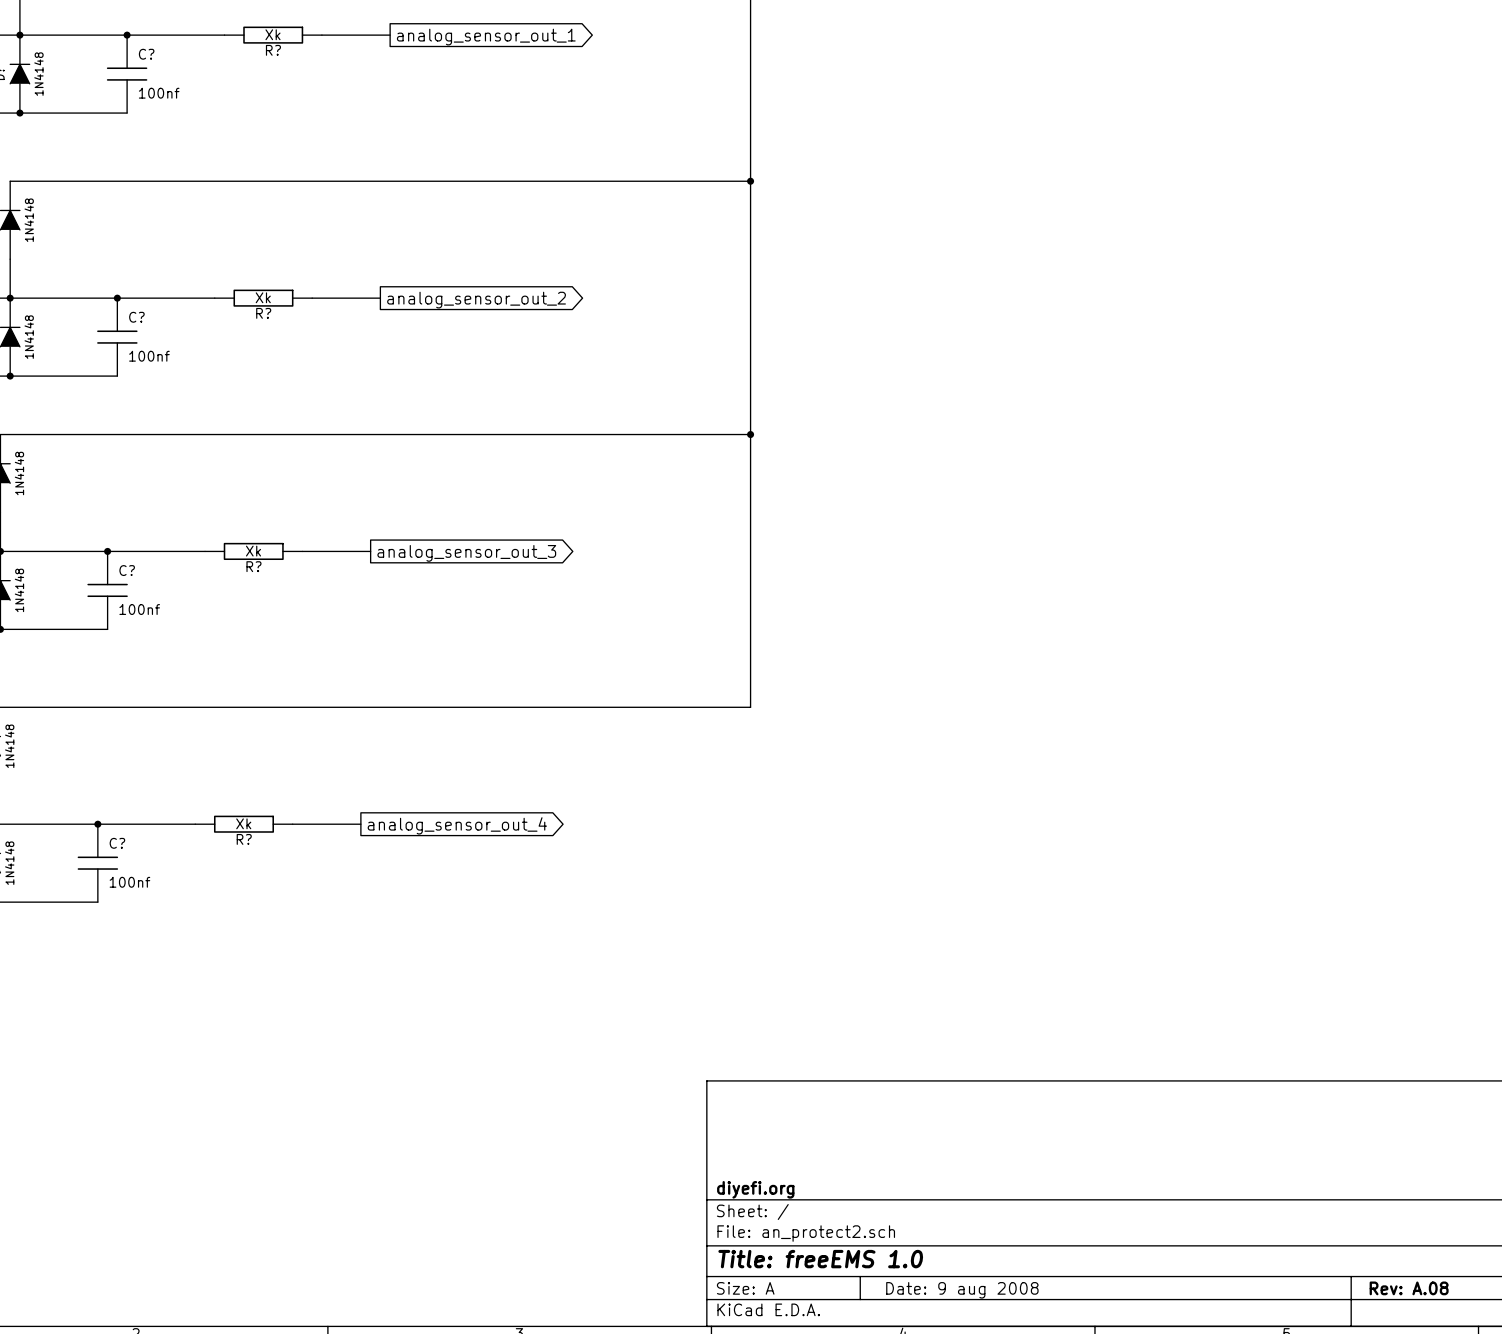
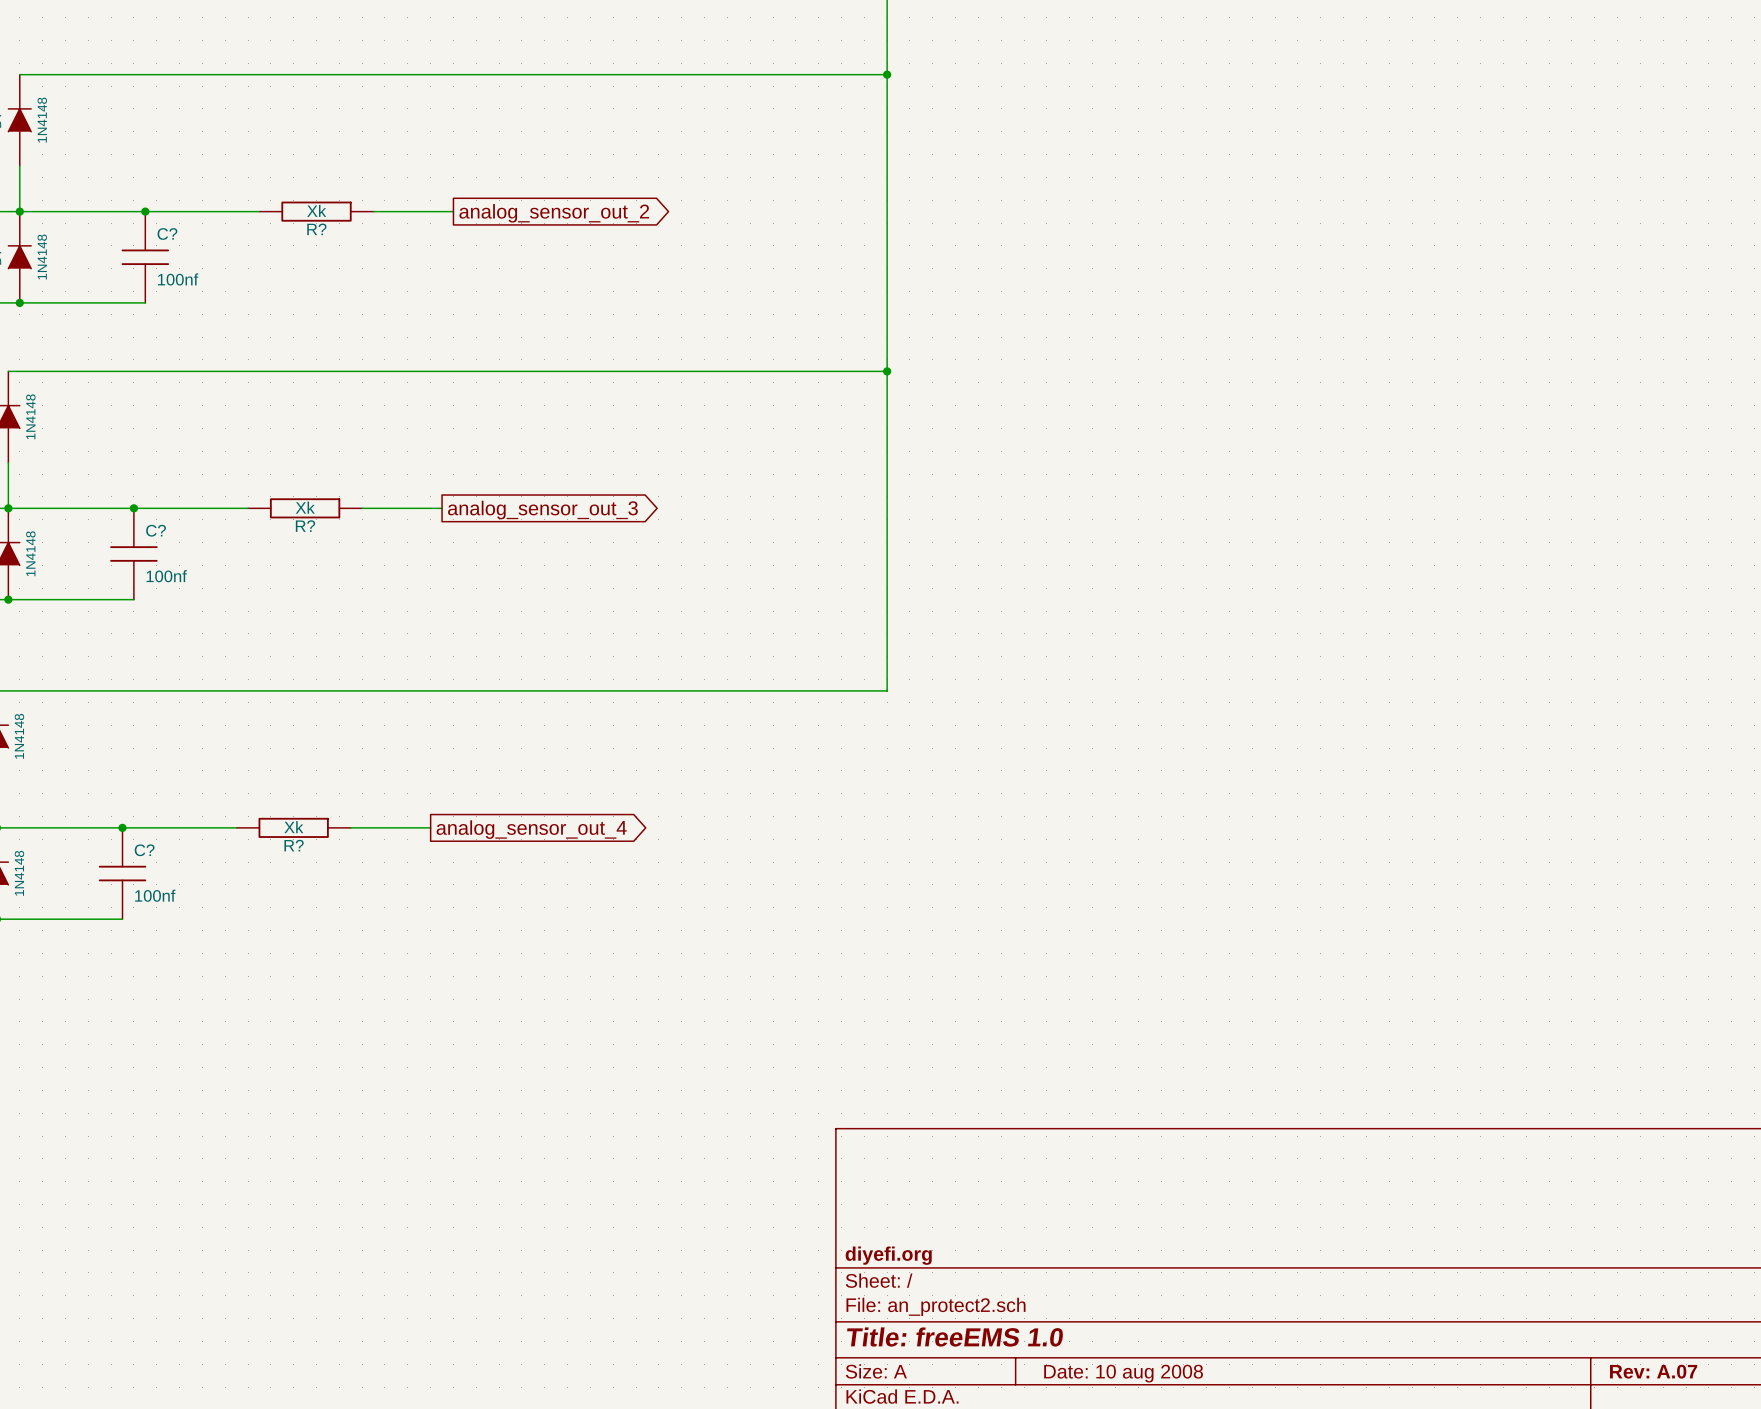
title block: Rev: A.08 (1409, 1288) -> Rev: A.07 (1653, 1371)
title block: Date: 9 aug 2008 (962, 1290) -> Date: 10 aug 2008 (1123, 1373)

